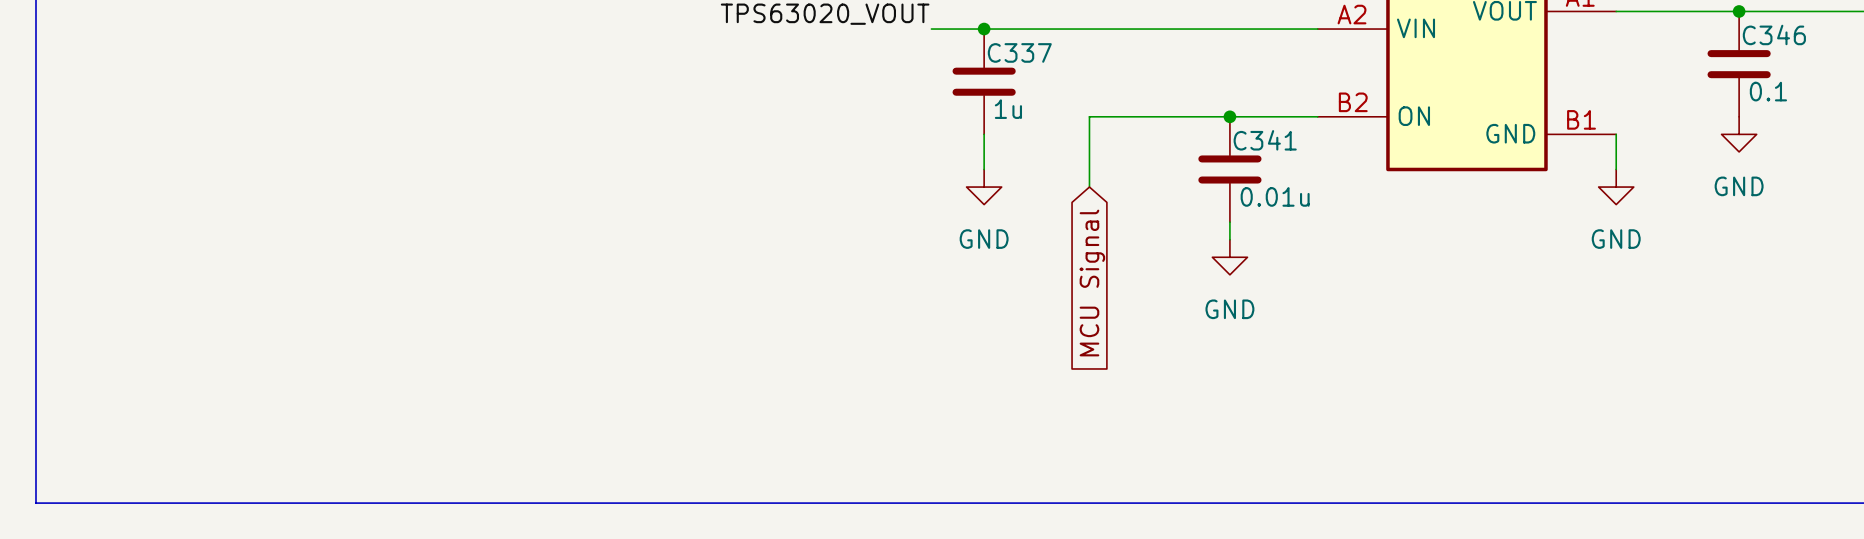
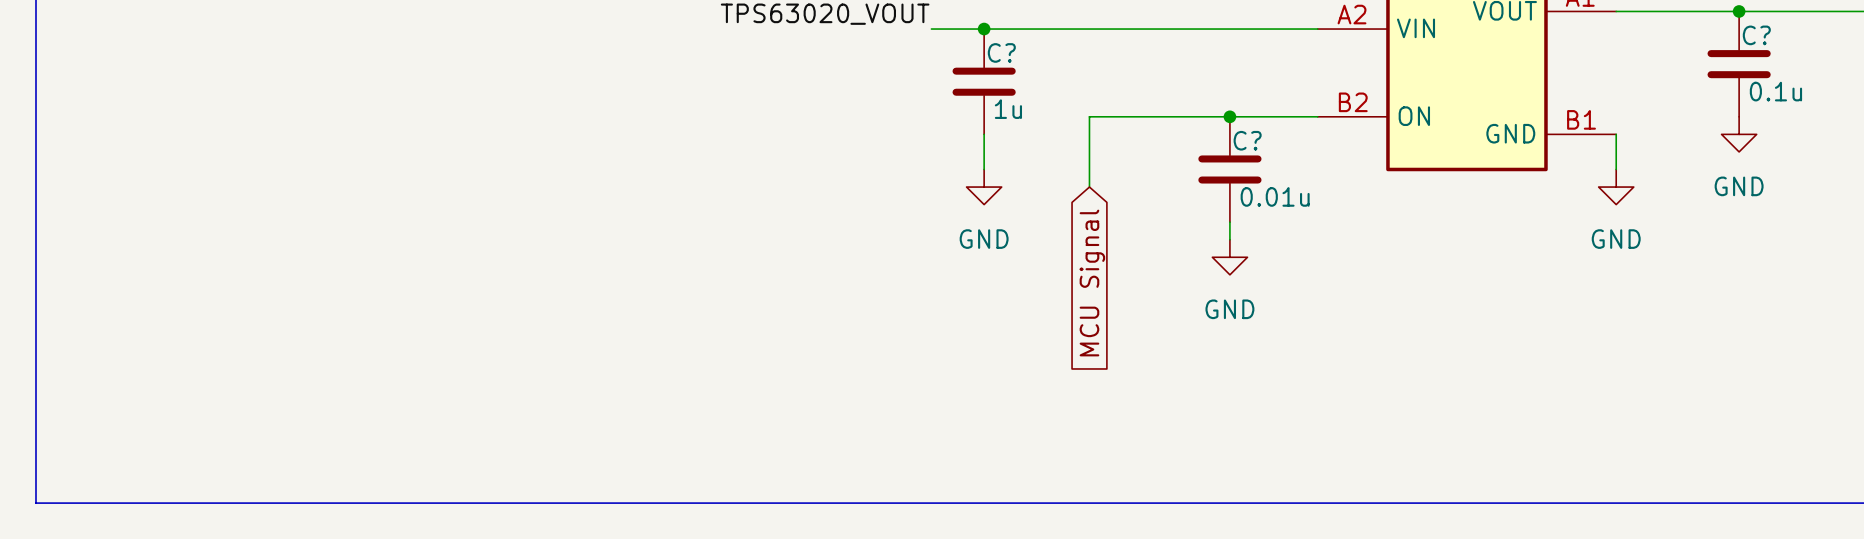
C346 name: C346 (1774, 34) -> C? (1756, 35)
C337 name: C337 (1019, 52) -> C? (1001, 52)
C346 value: 0.1 (1768, 91) -> 0.1u (1775, 91)
C341 name: C341 (1265, 140) -> C? (1247, 140)

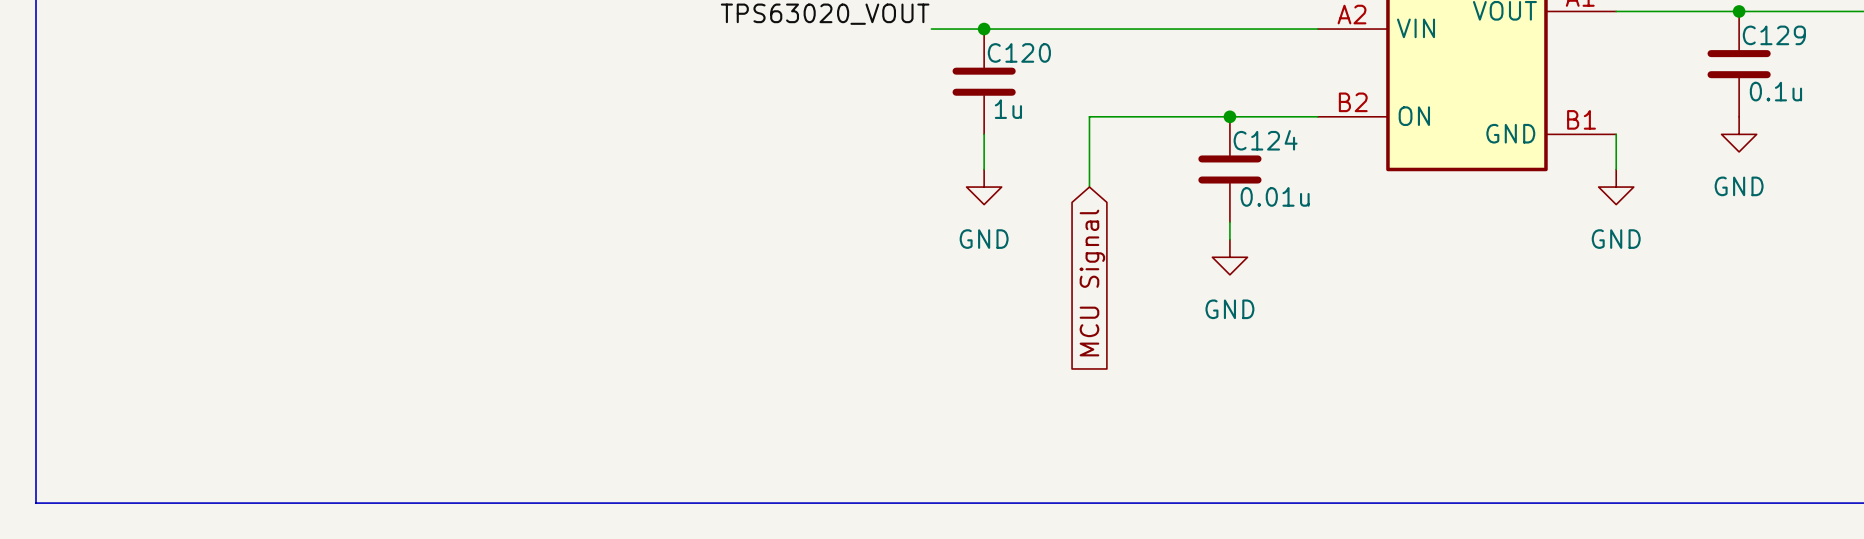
C? name: C? (1756, 35) -> C129 (1774, 35)
C? name: C? (1001, 52) -> C120 (1019, 52)
C? name: C? (1247, 140) -> C124 (1265, 140)

